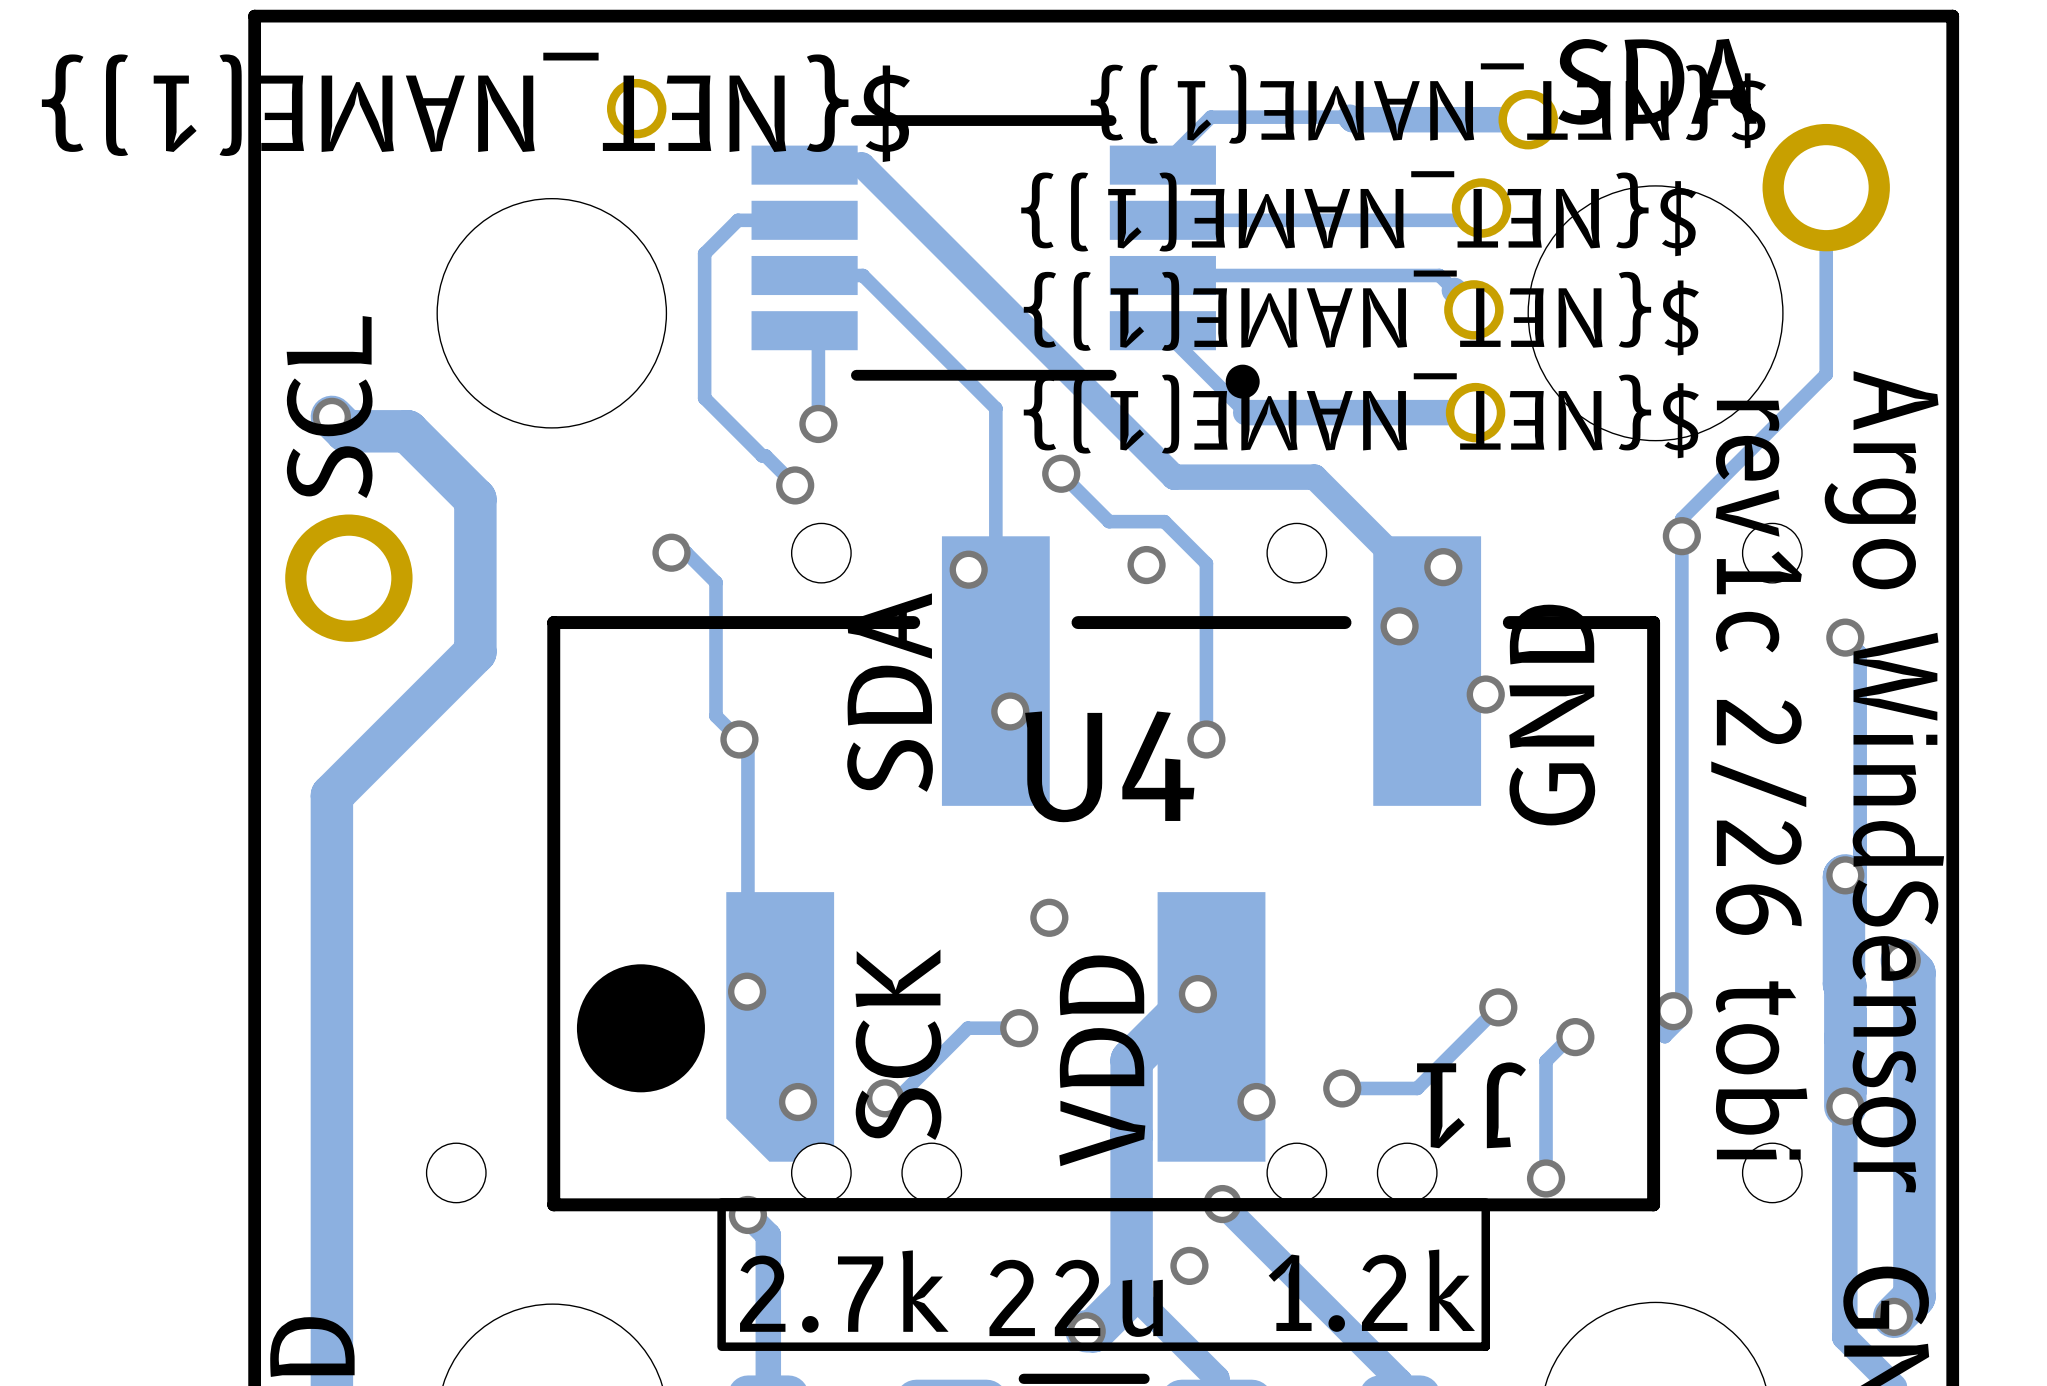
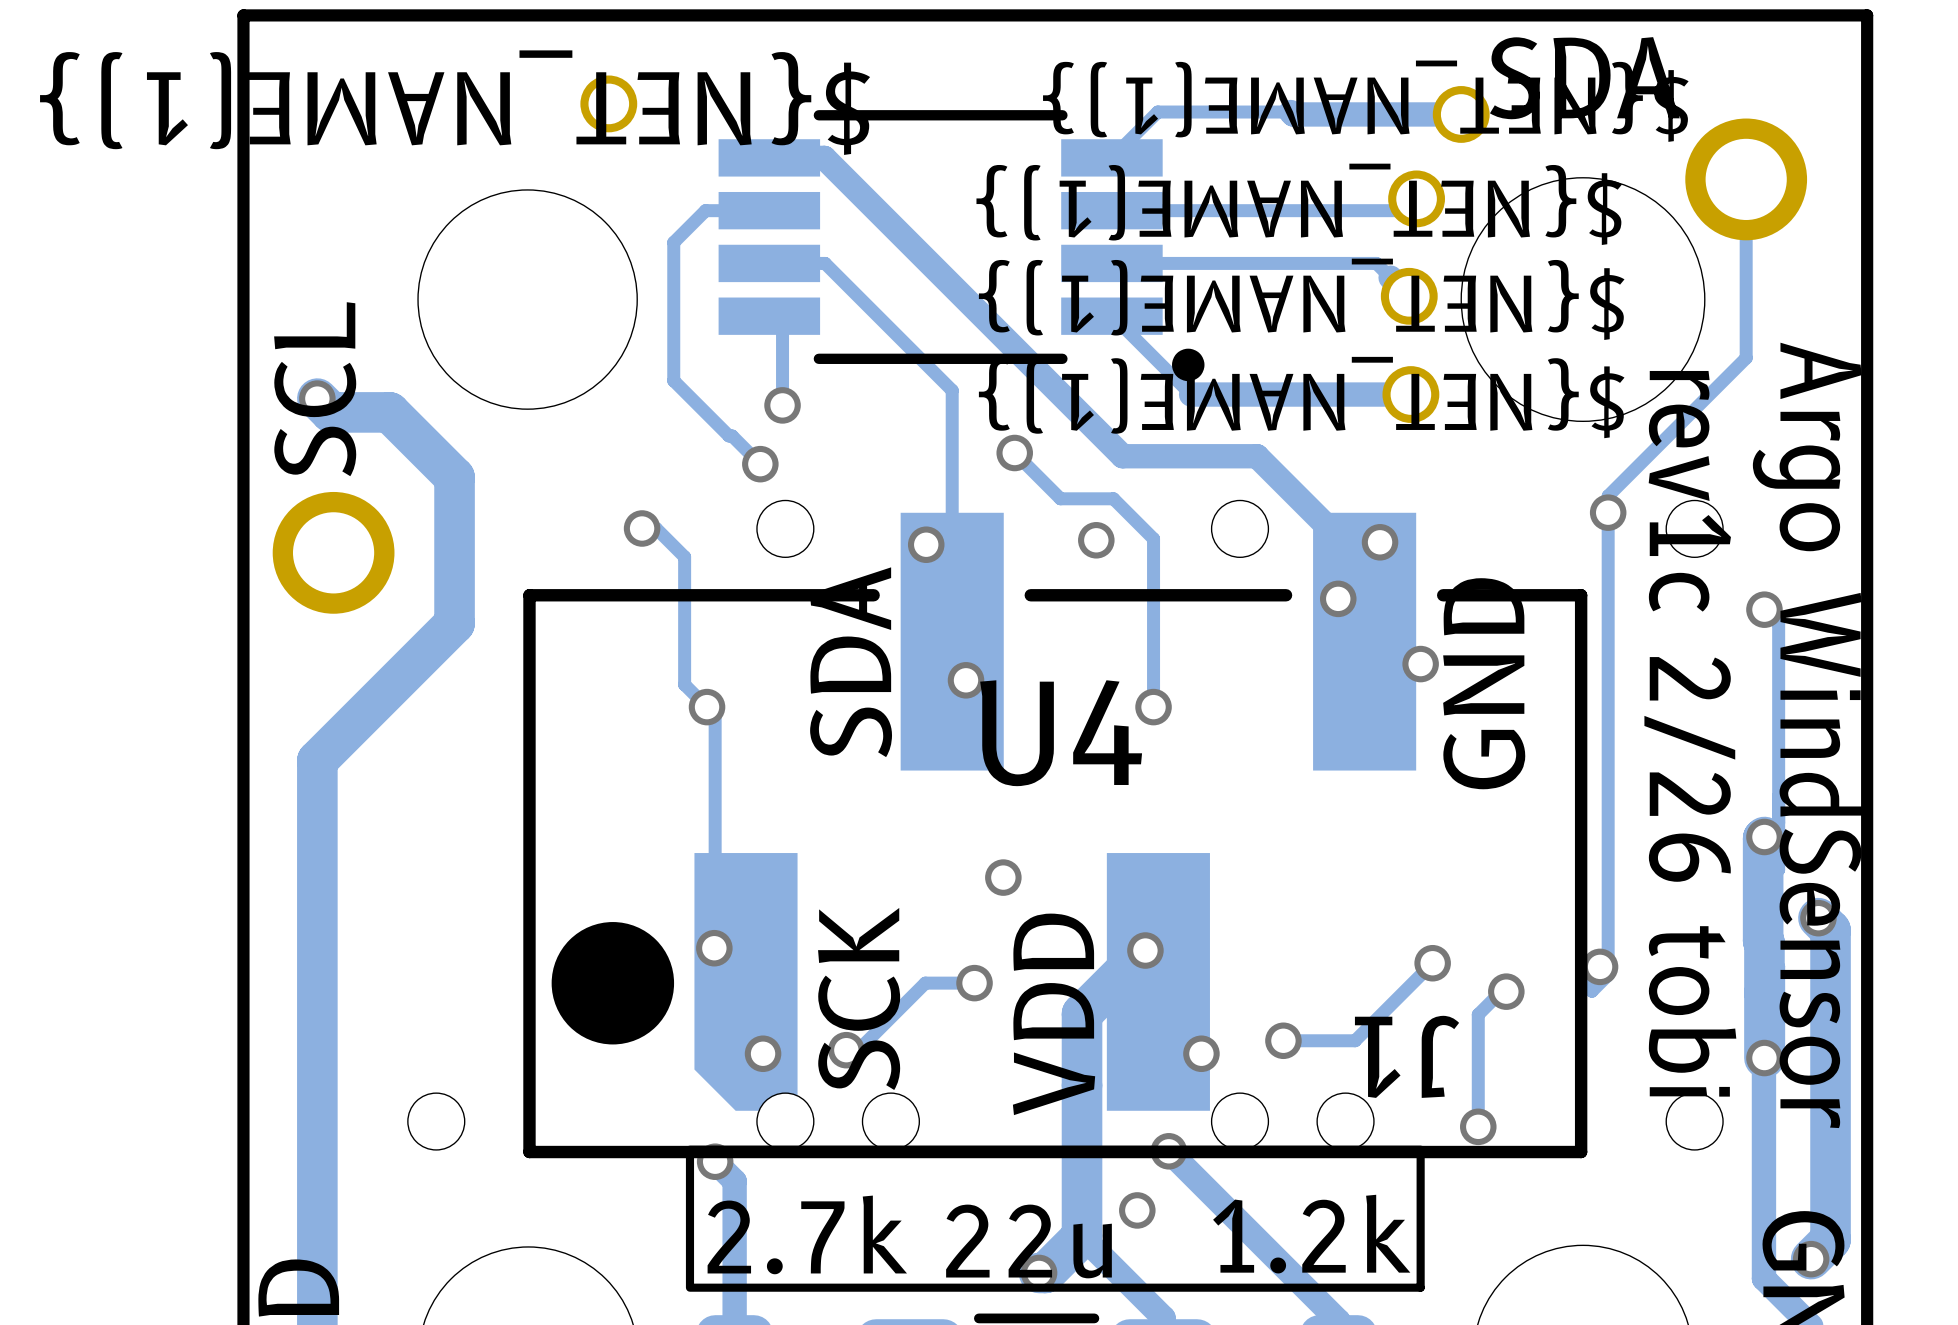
text position: rev1c 2/26 tobi (1759, 780) -> rev1c 2/26 tobi (1690, 733)
text position: Argo WindSensor (1884, 781) -> Argo WindSensor (1809, 735)

